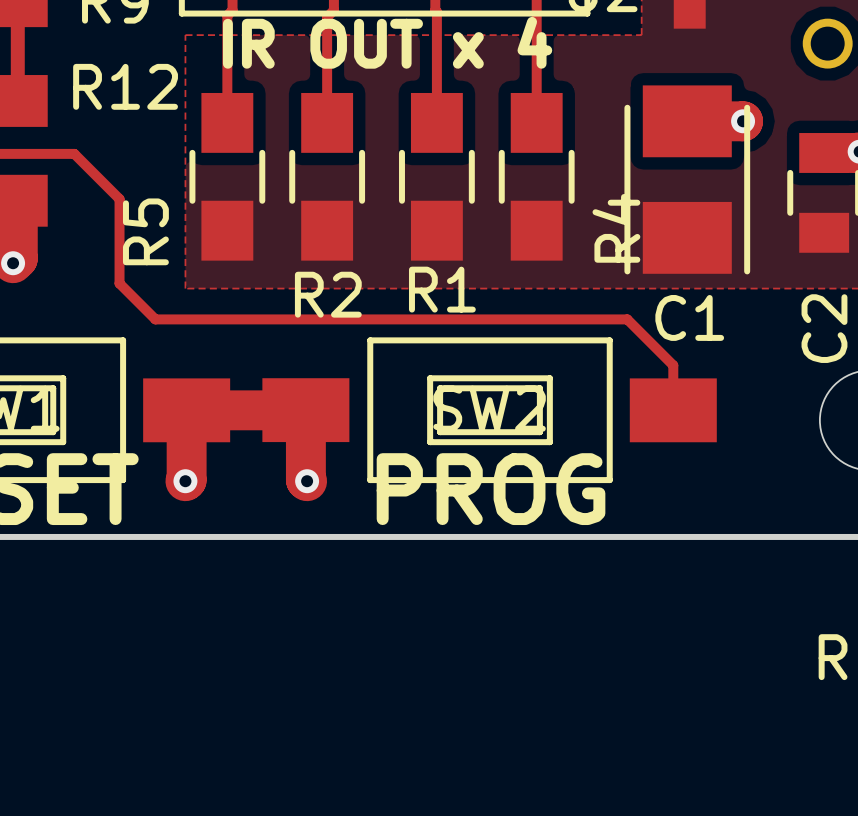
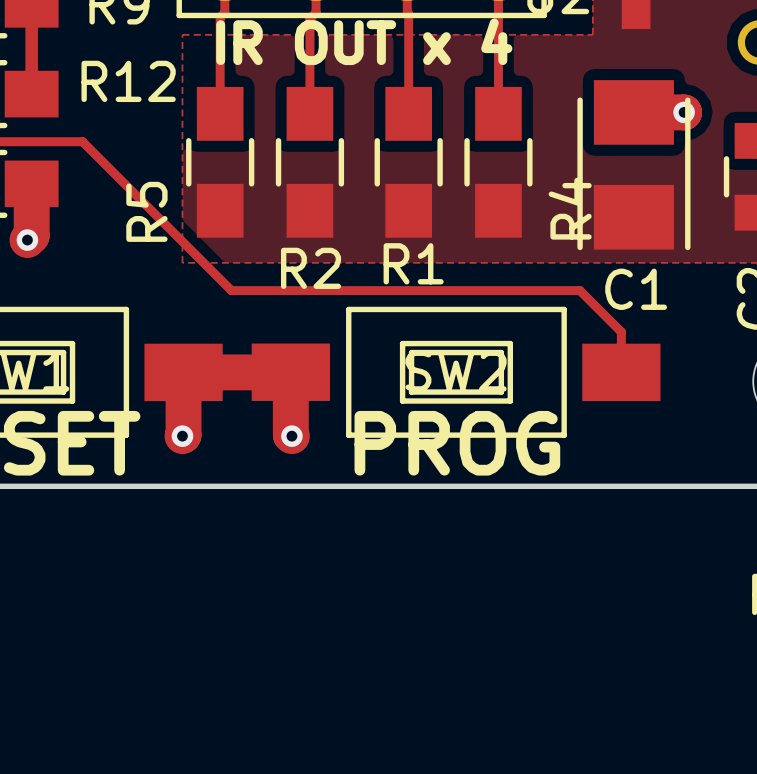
track: (119, 199) (119, 283) (155, 319) (239, 319) -> (123, 182) (231, 290)

